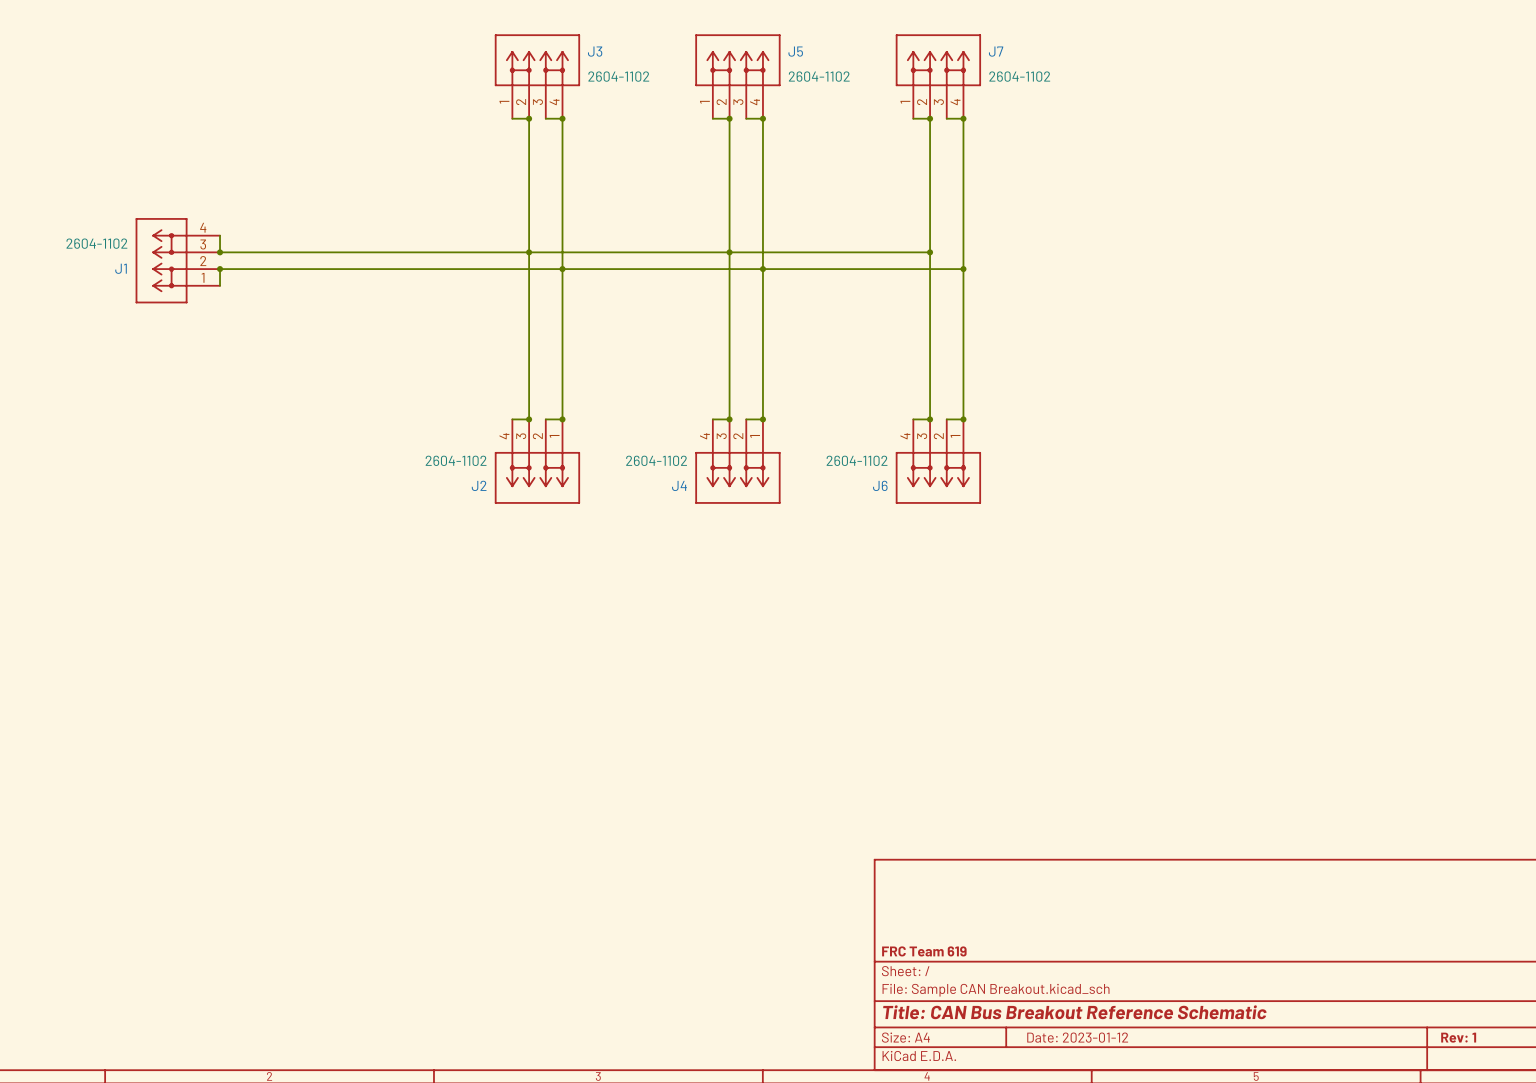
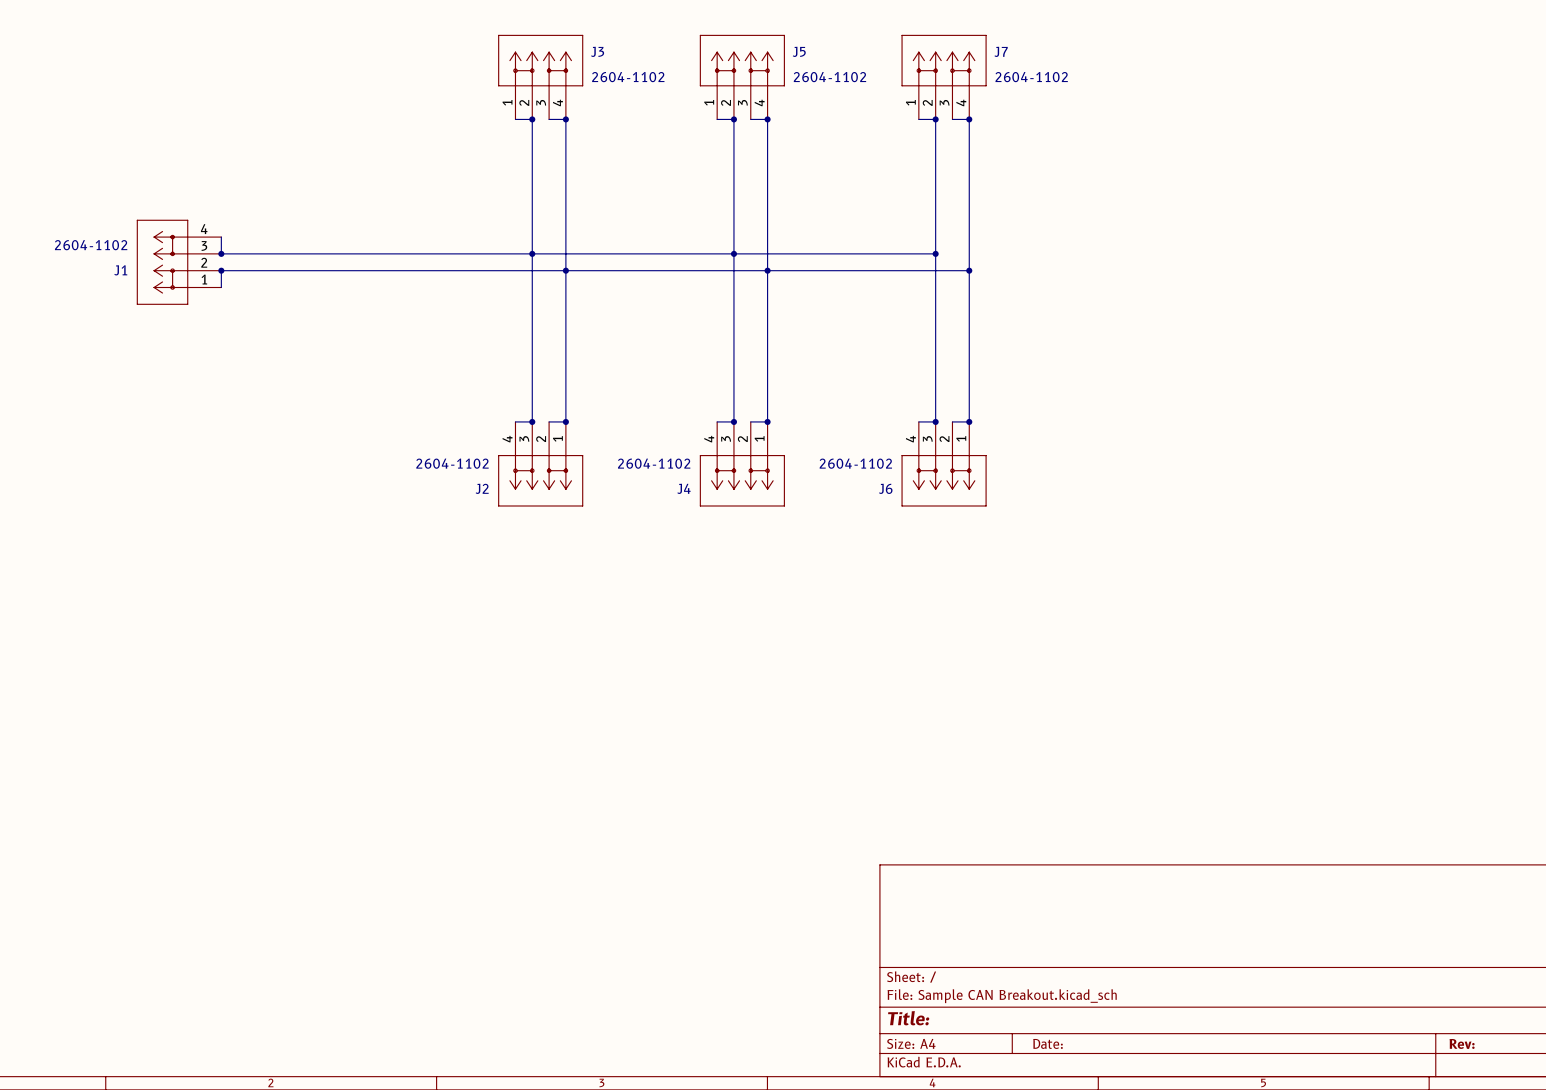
title block: FRC Team 619 (924, 951) -> none
title block: Title: CAN Bus Breakout Reference Schematic (1074, 1012) -> Title: (908, 1018)
title block: Date: 2023-01-12 (1077, 1037) -> Date: (1048, 1043)
title block: Rev: 1 (1458, 1037) -> Rev: (1462, 1043)

